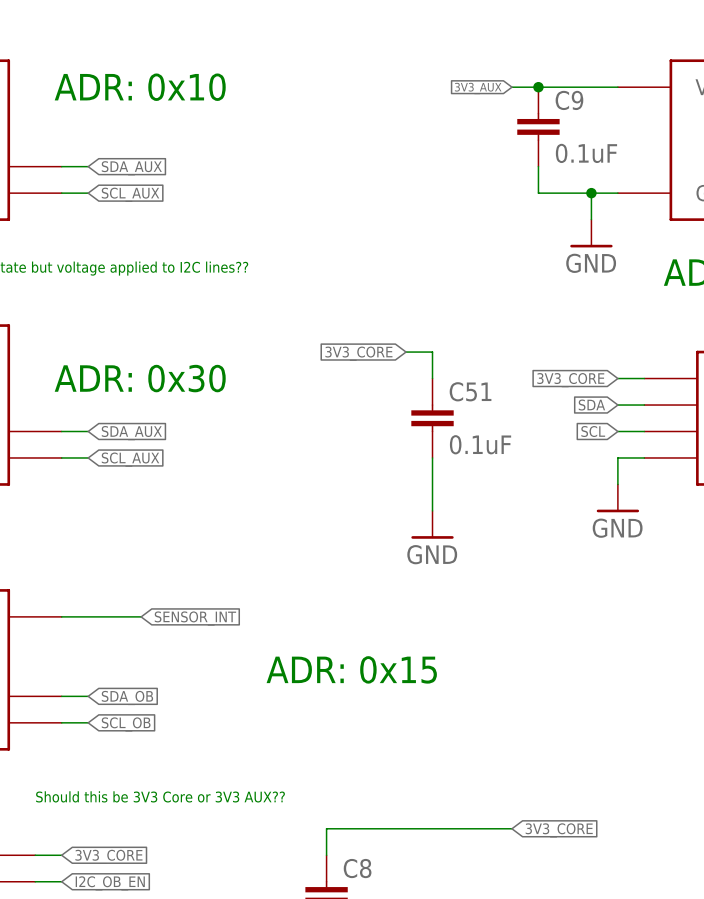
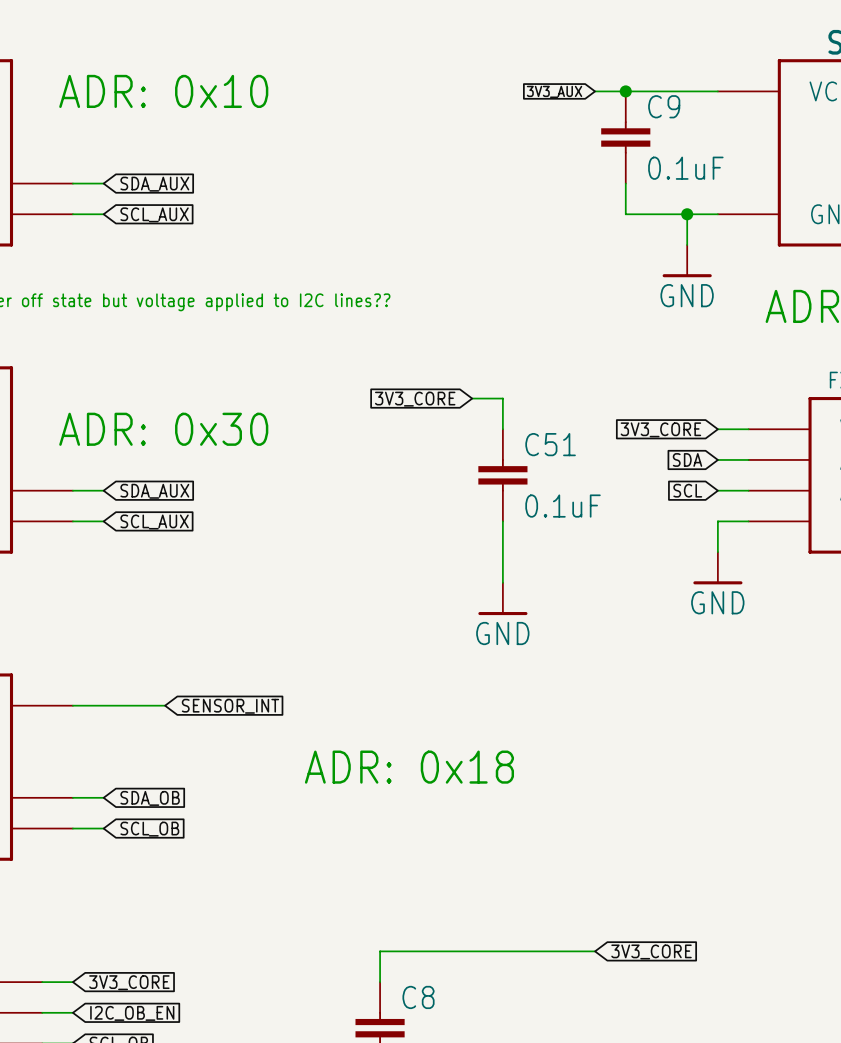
text: ADR: 0x15 (351, 669) -> ADR: 0x18 (409, 767)
text: Should this be 3V3 Core or 3V3 AUX?? (160, 796) -> none

